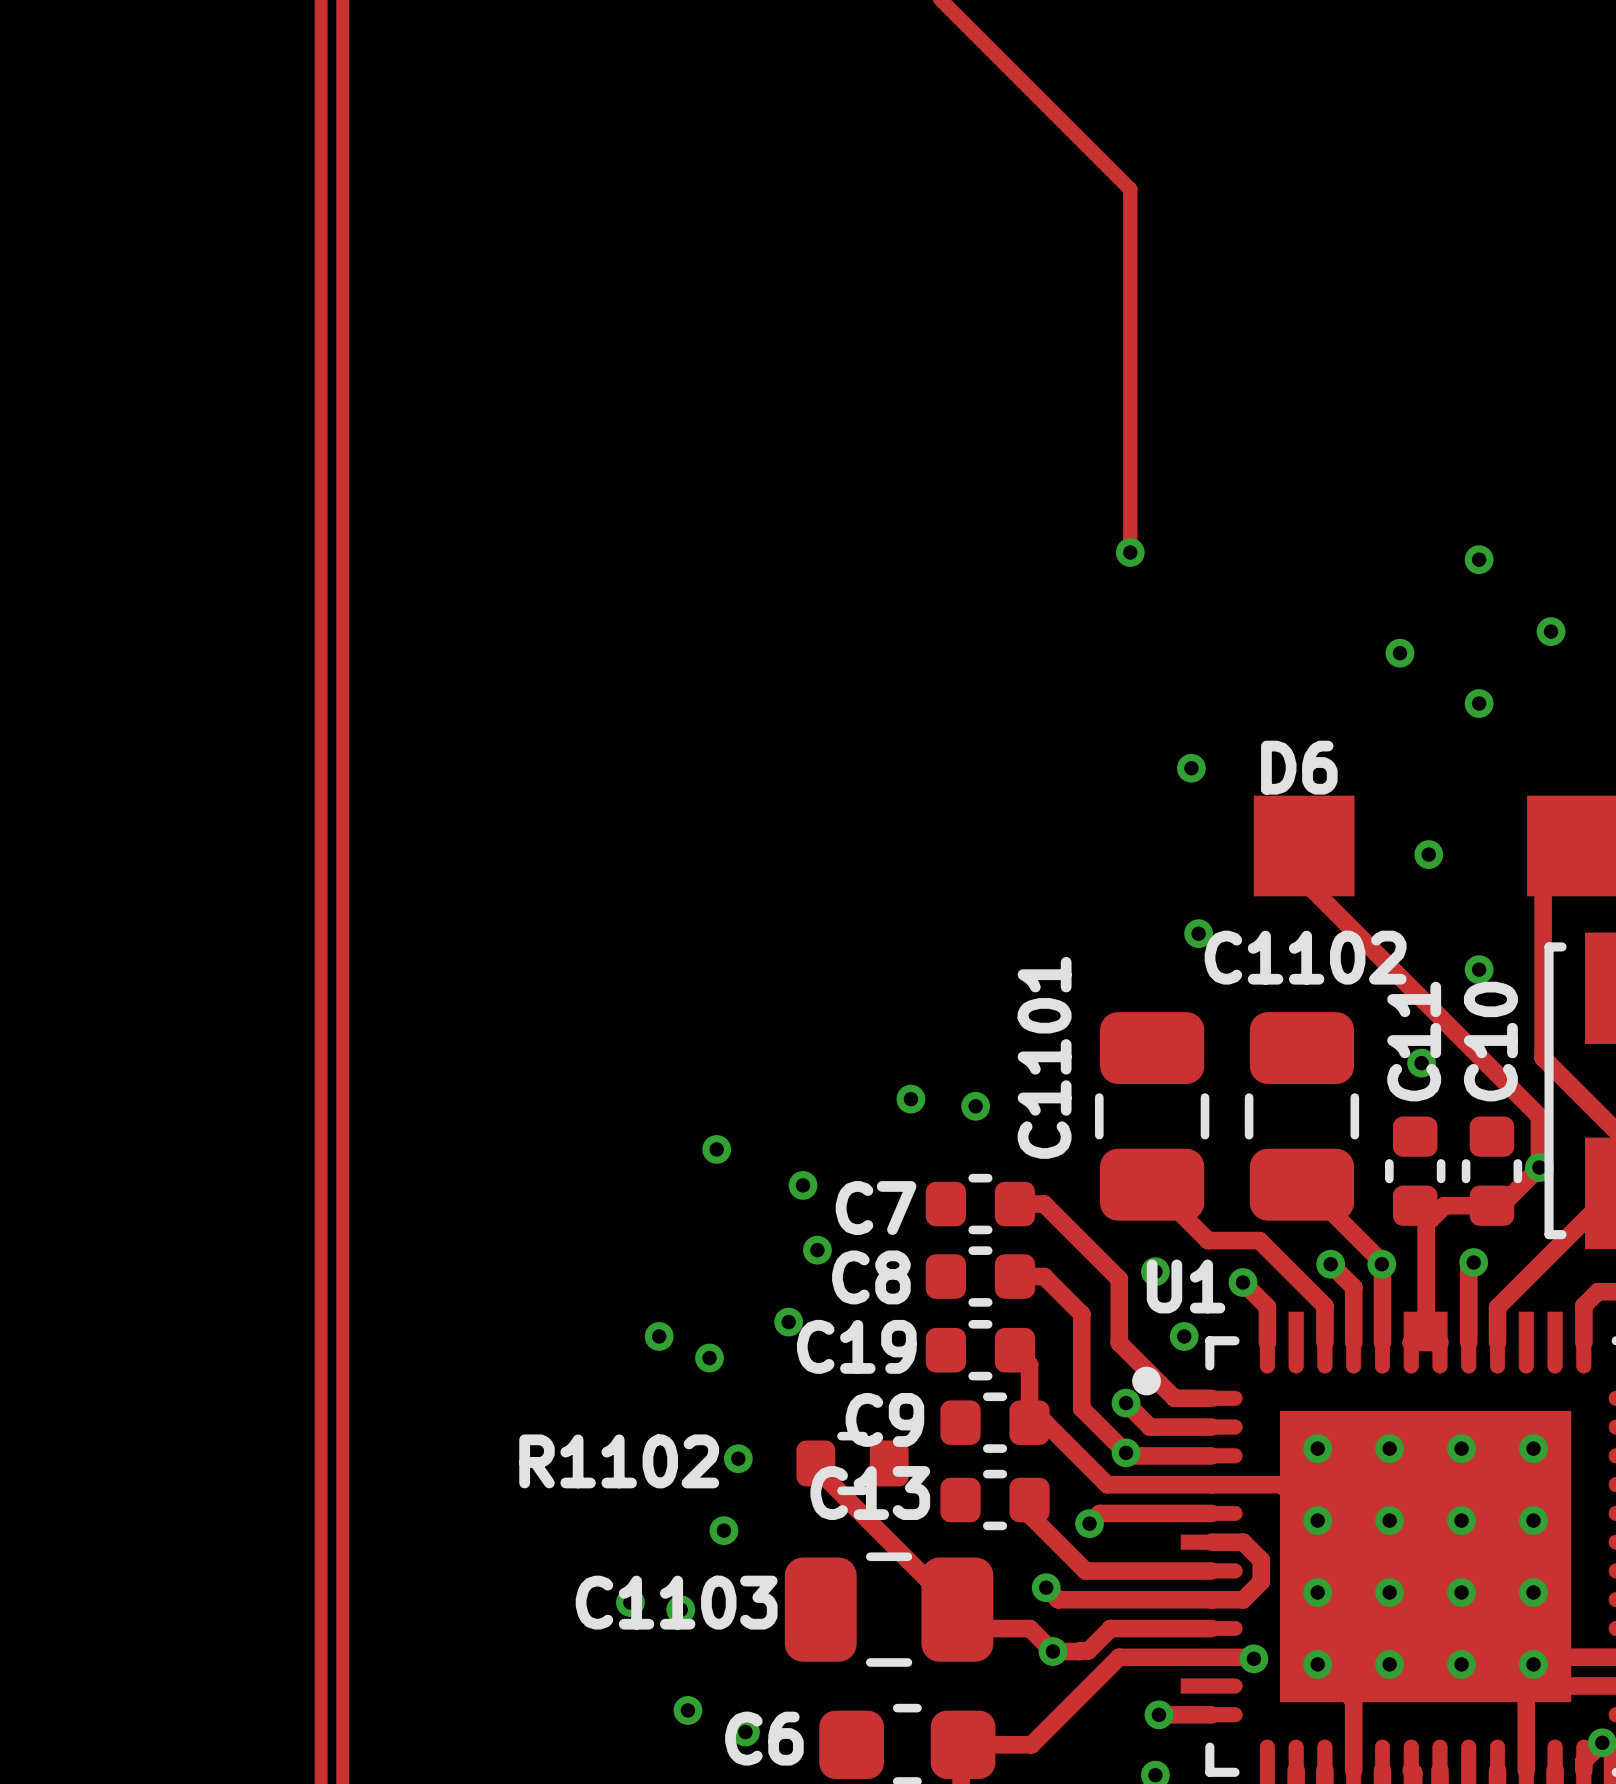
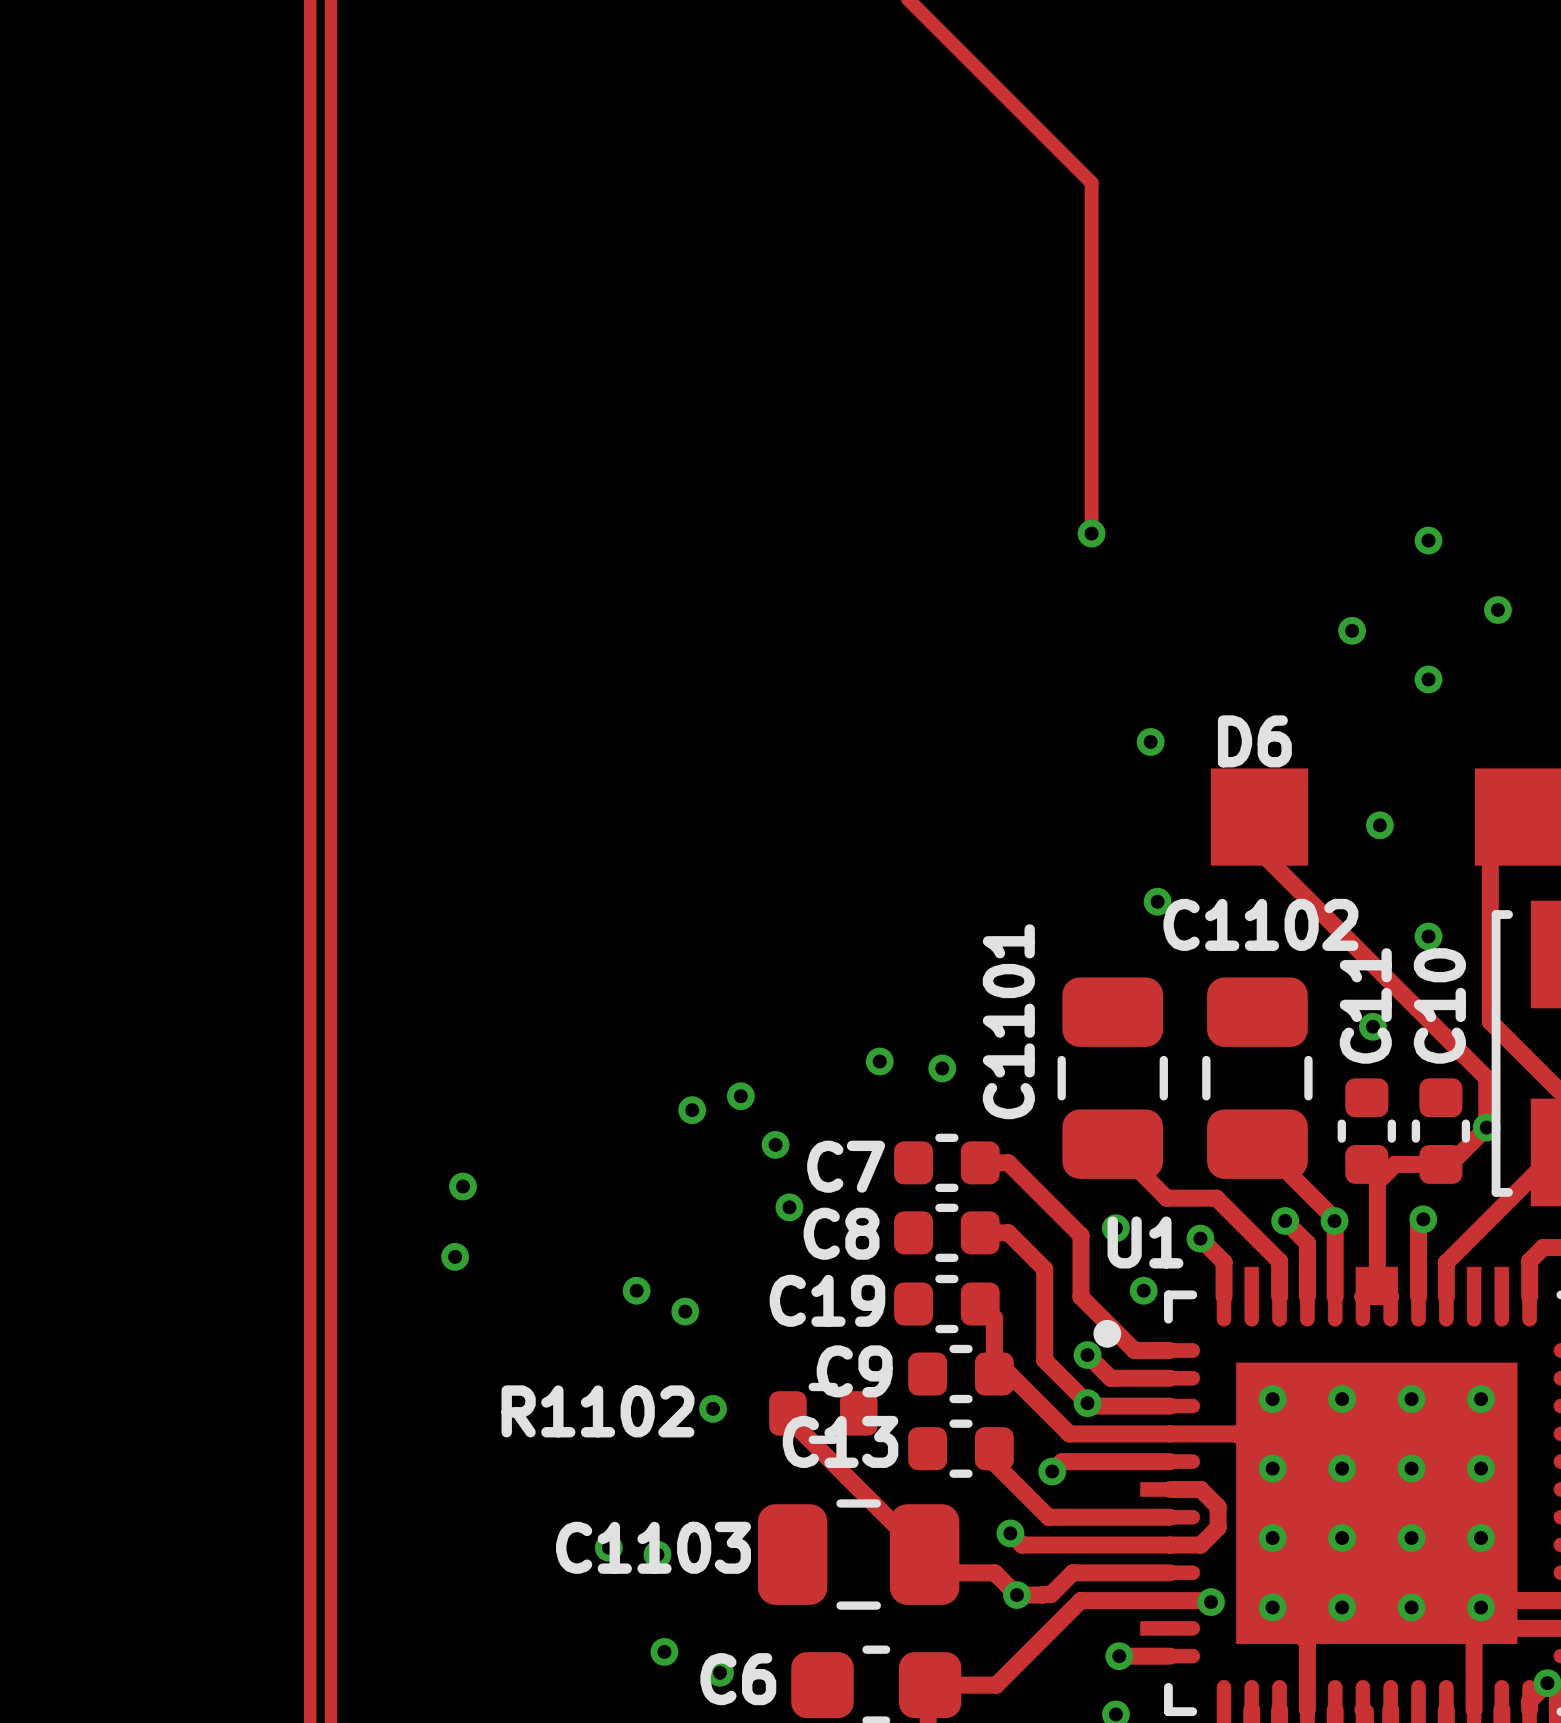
via: none -> (740, 1096)
via: none -> (462, 1186)
via: none -> (455, 1256)
via: (788, 1322) -> none
via: (723, 1530) -> none

